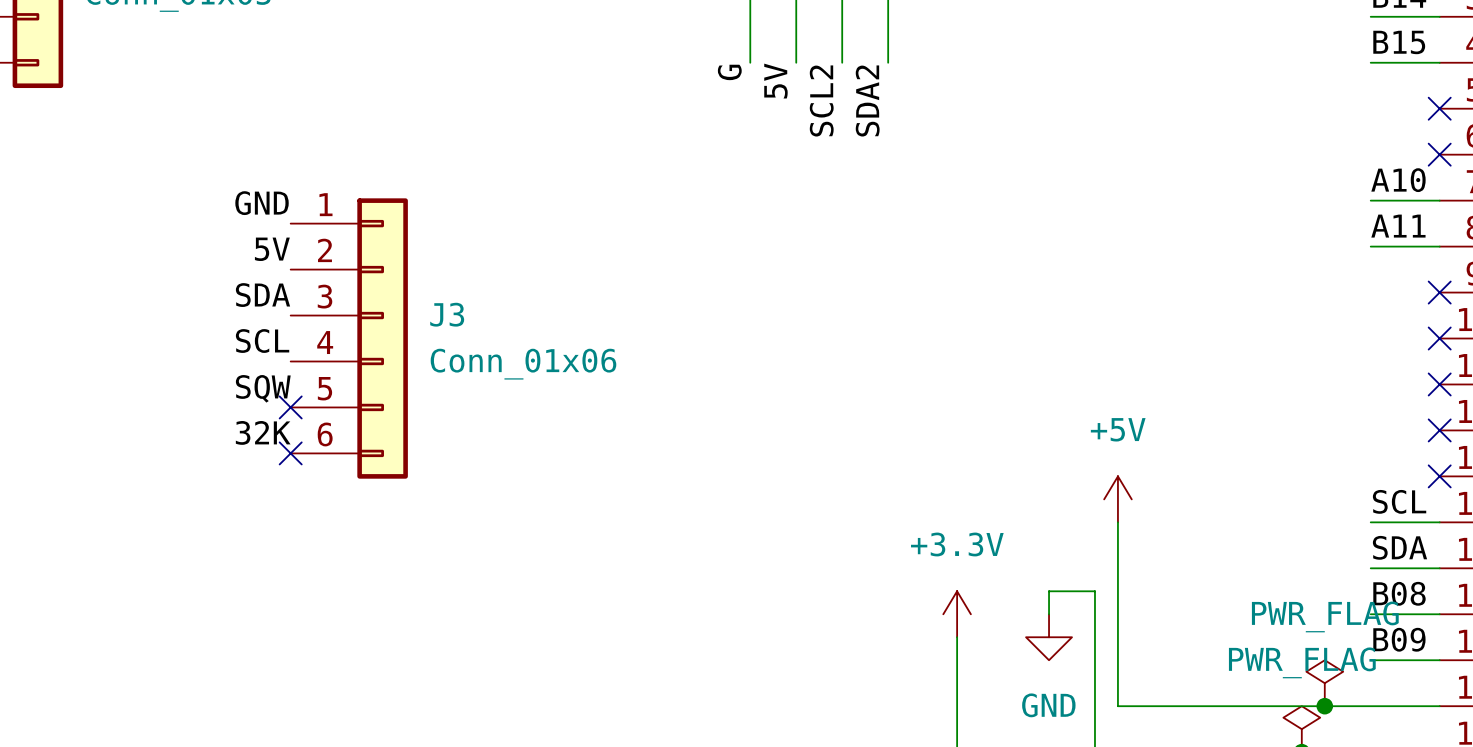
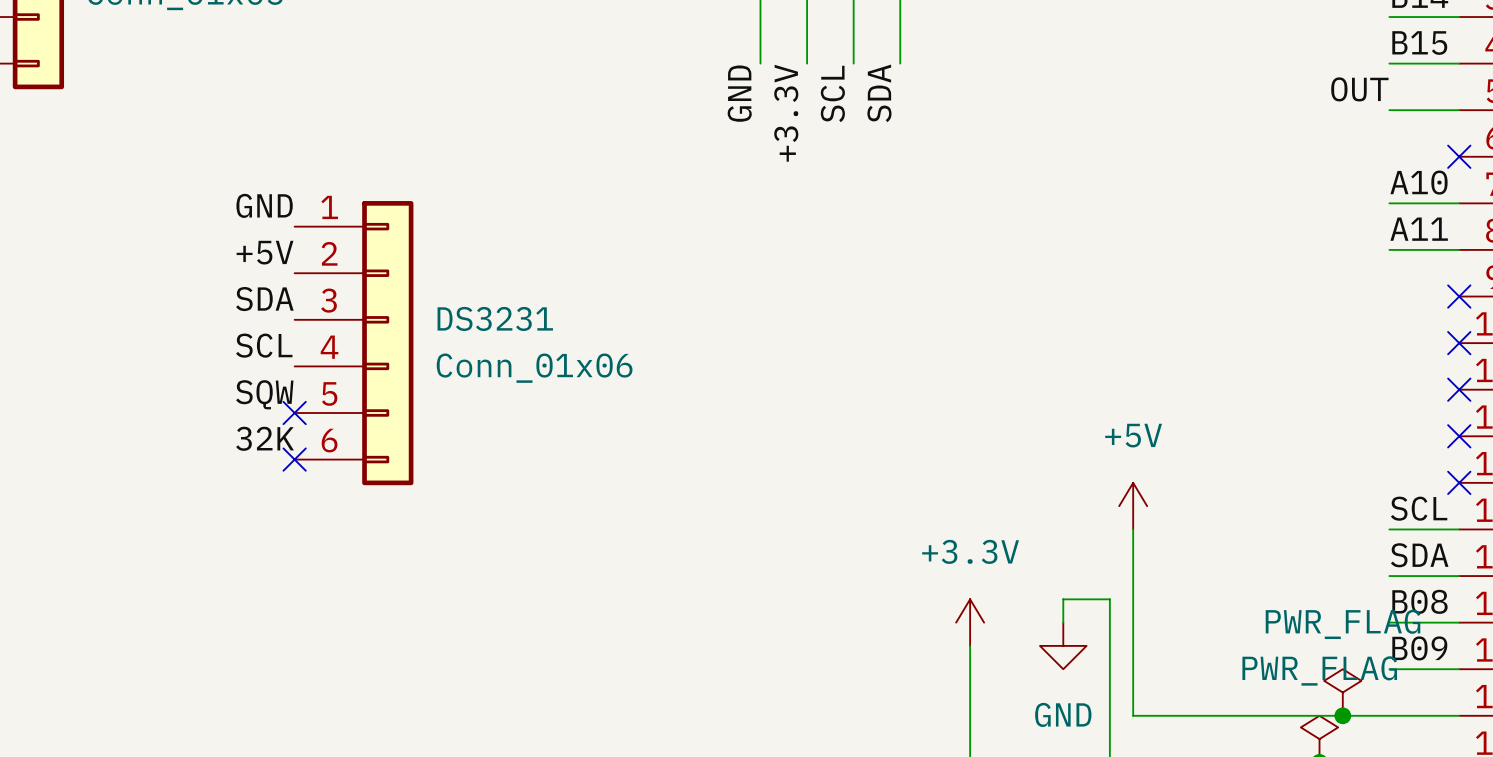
label: G (729, 72) -> GND (739, 93)
label: 5V (775, 81) -> +3.3V (786, 113)
label: none -> OUT (1359, 89)
label: SCL2 (821, 100) -> SCL (832, 93)
label: SDA2 (867, 100) -> SDA (879, 93)
wire: none -> (1389, 110) (1459, 110)
no-connect mark: (1439, 108) -> none
label: 5V (272, 249) -> +5V (265, 252)
J3 name: J3 (447, 314) -> DS3231 (495, 318)

